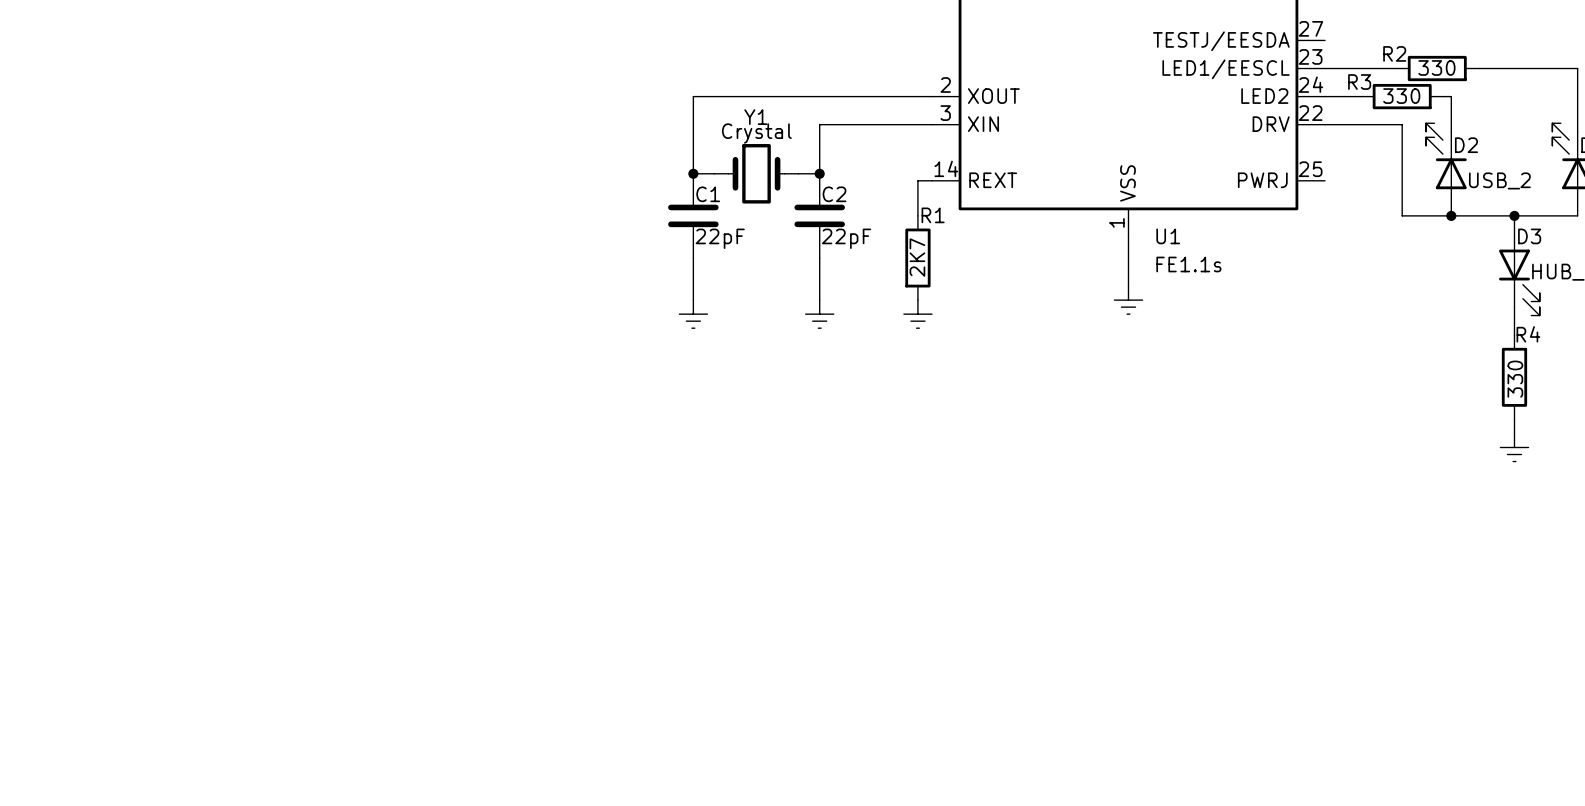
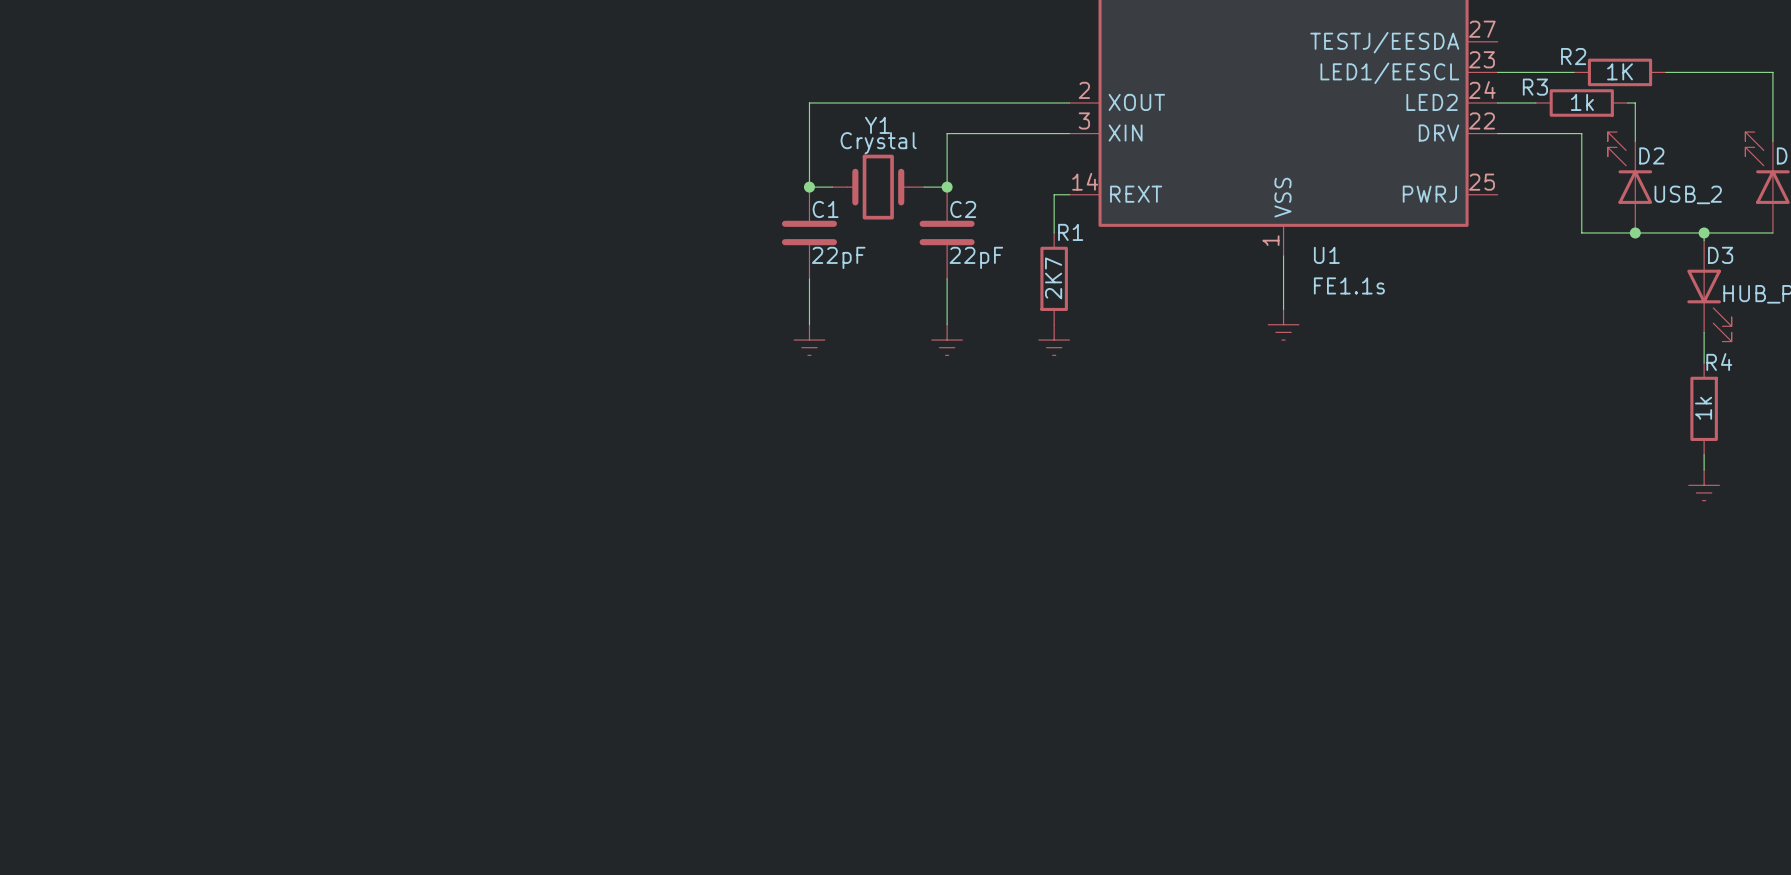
R2 value: 330 (1436, 67) -> 1K (1620, 71)
R3 value: 330 (1401, 96) -> 1k (1582, 102)
R4 value: 330 (1515, 379) -> 1k (1703, 408)

